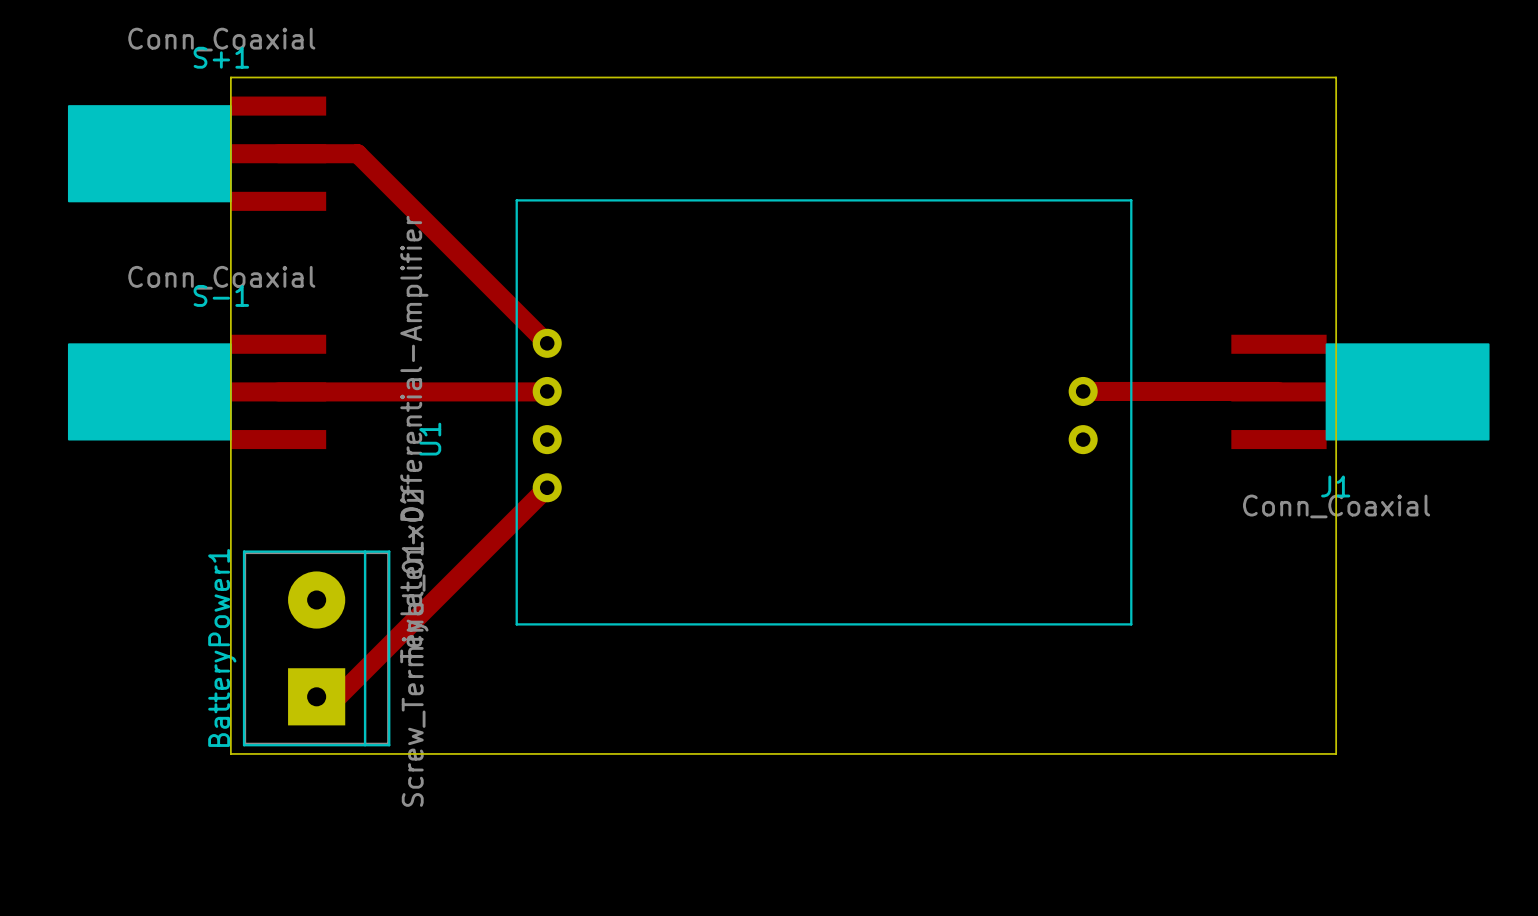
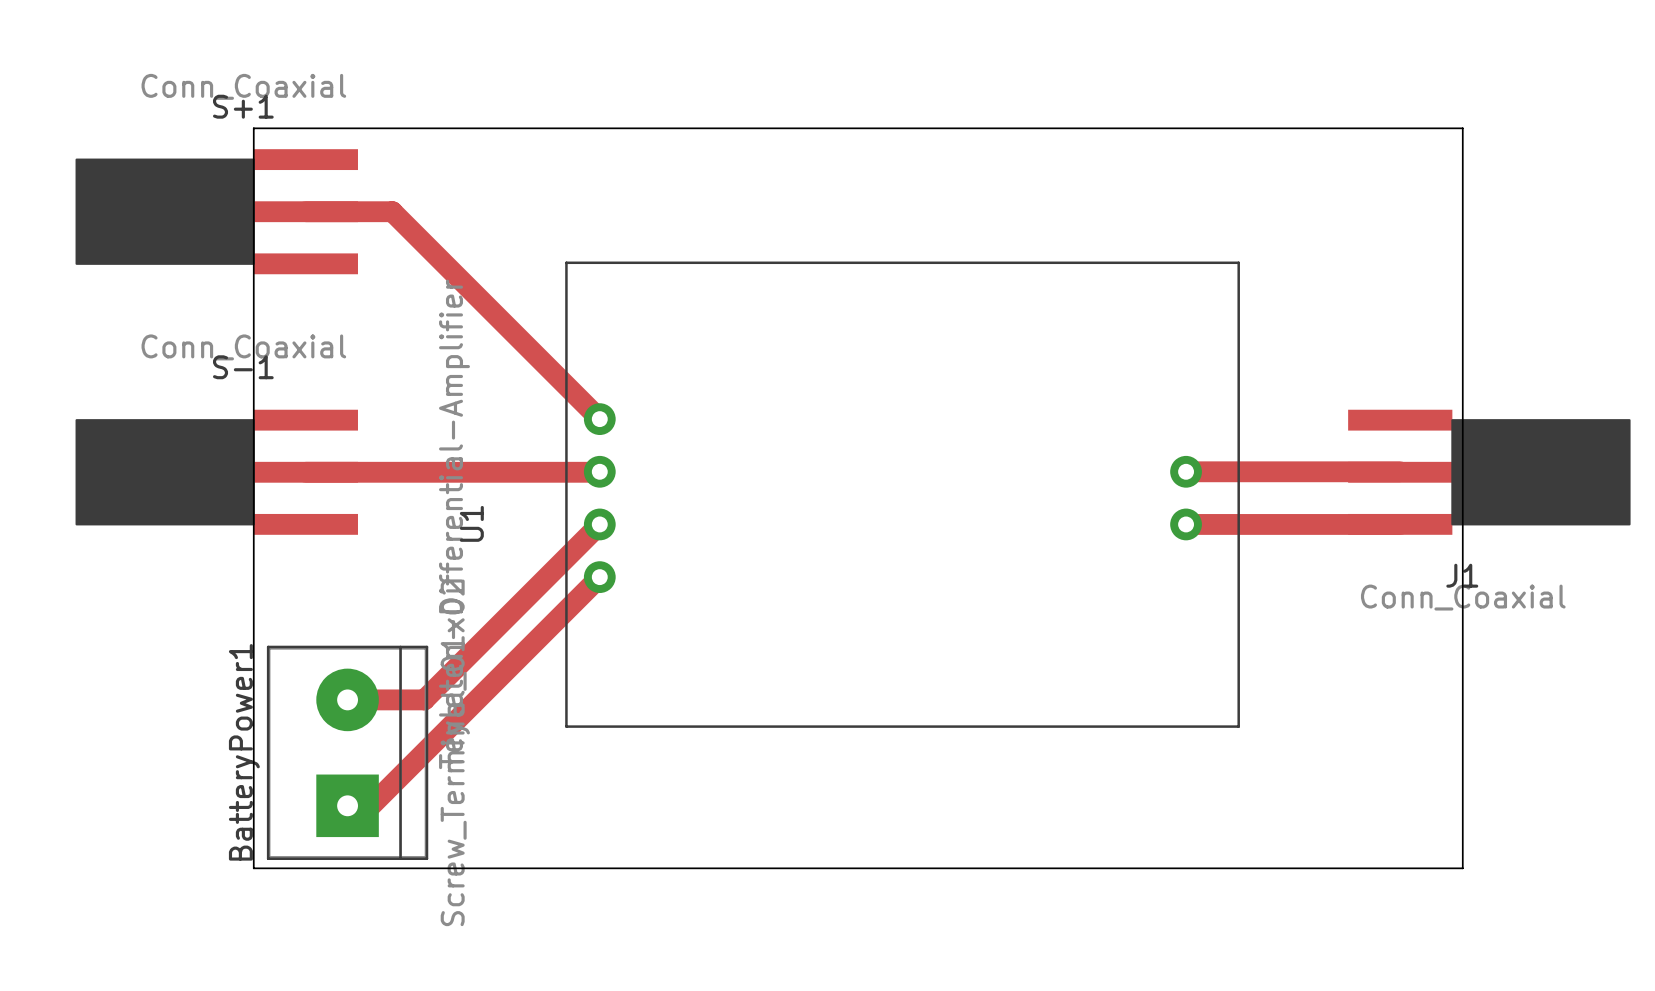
top track: none -> (599, 524) (424, 699) (347, 699)
top track: none -> (1186, 524) (1400, 524)

